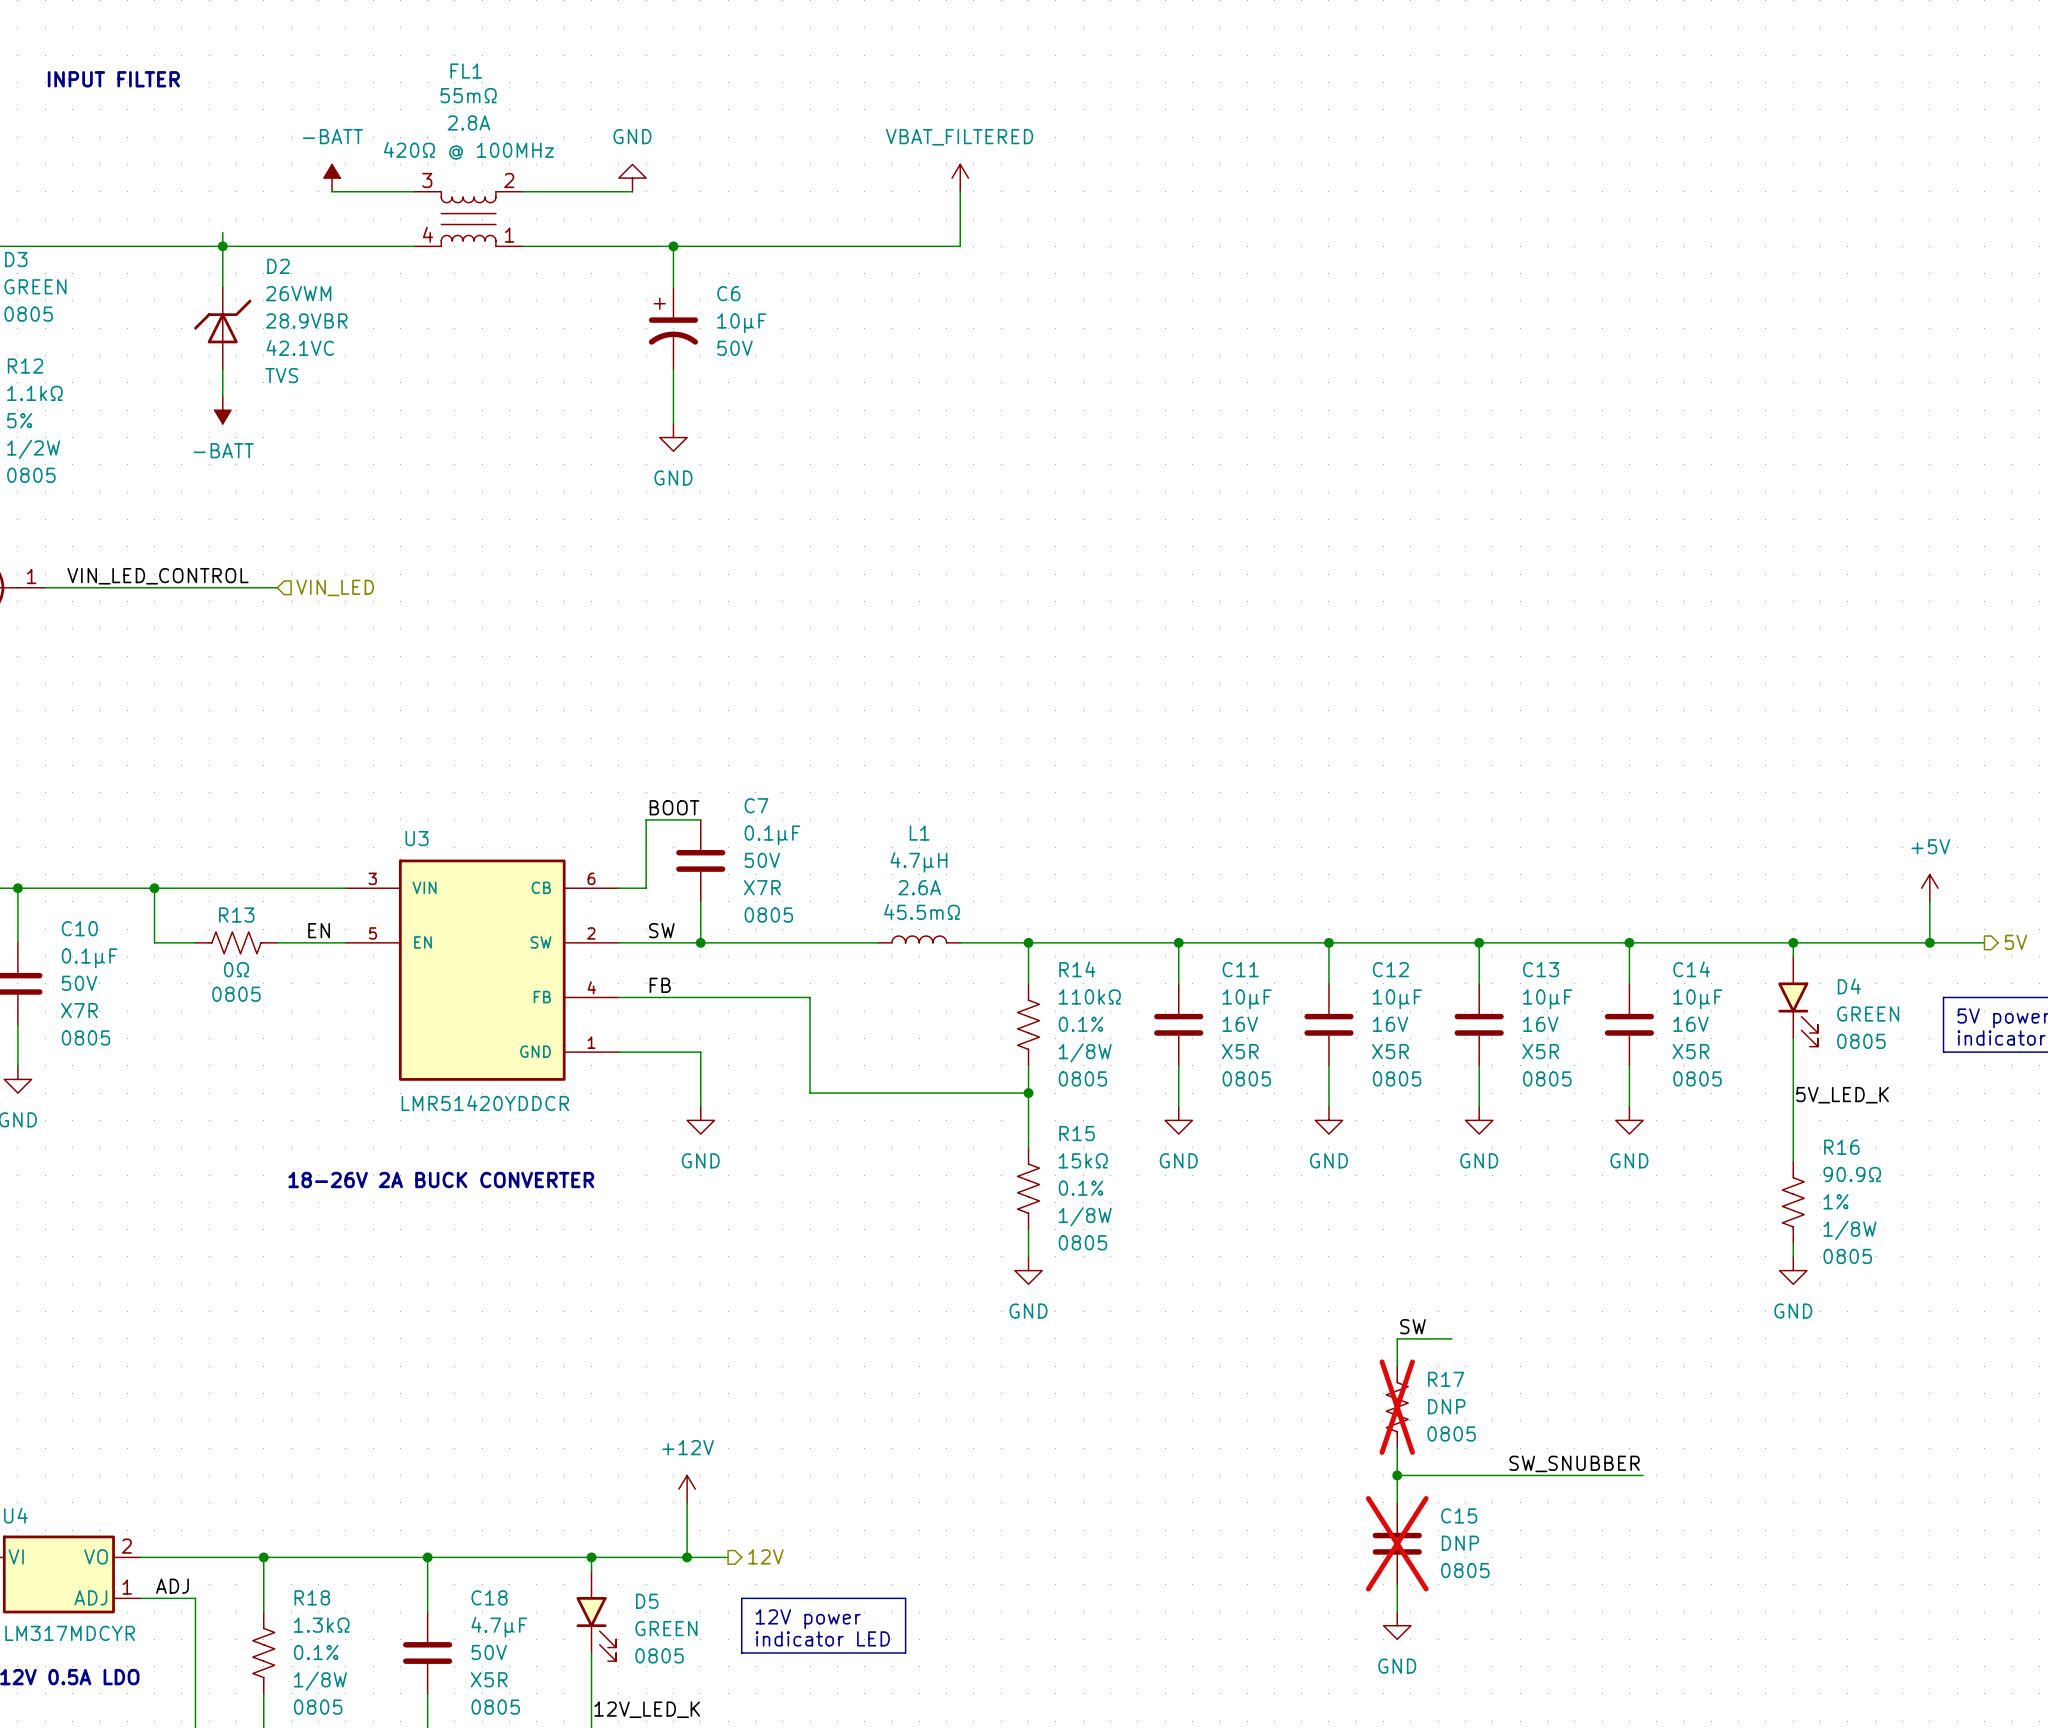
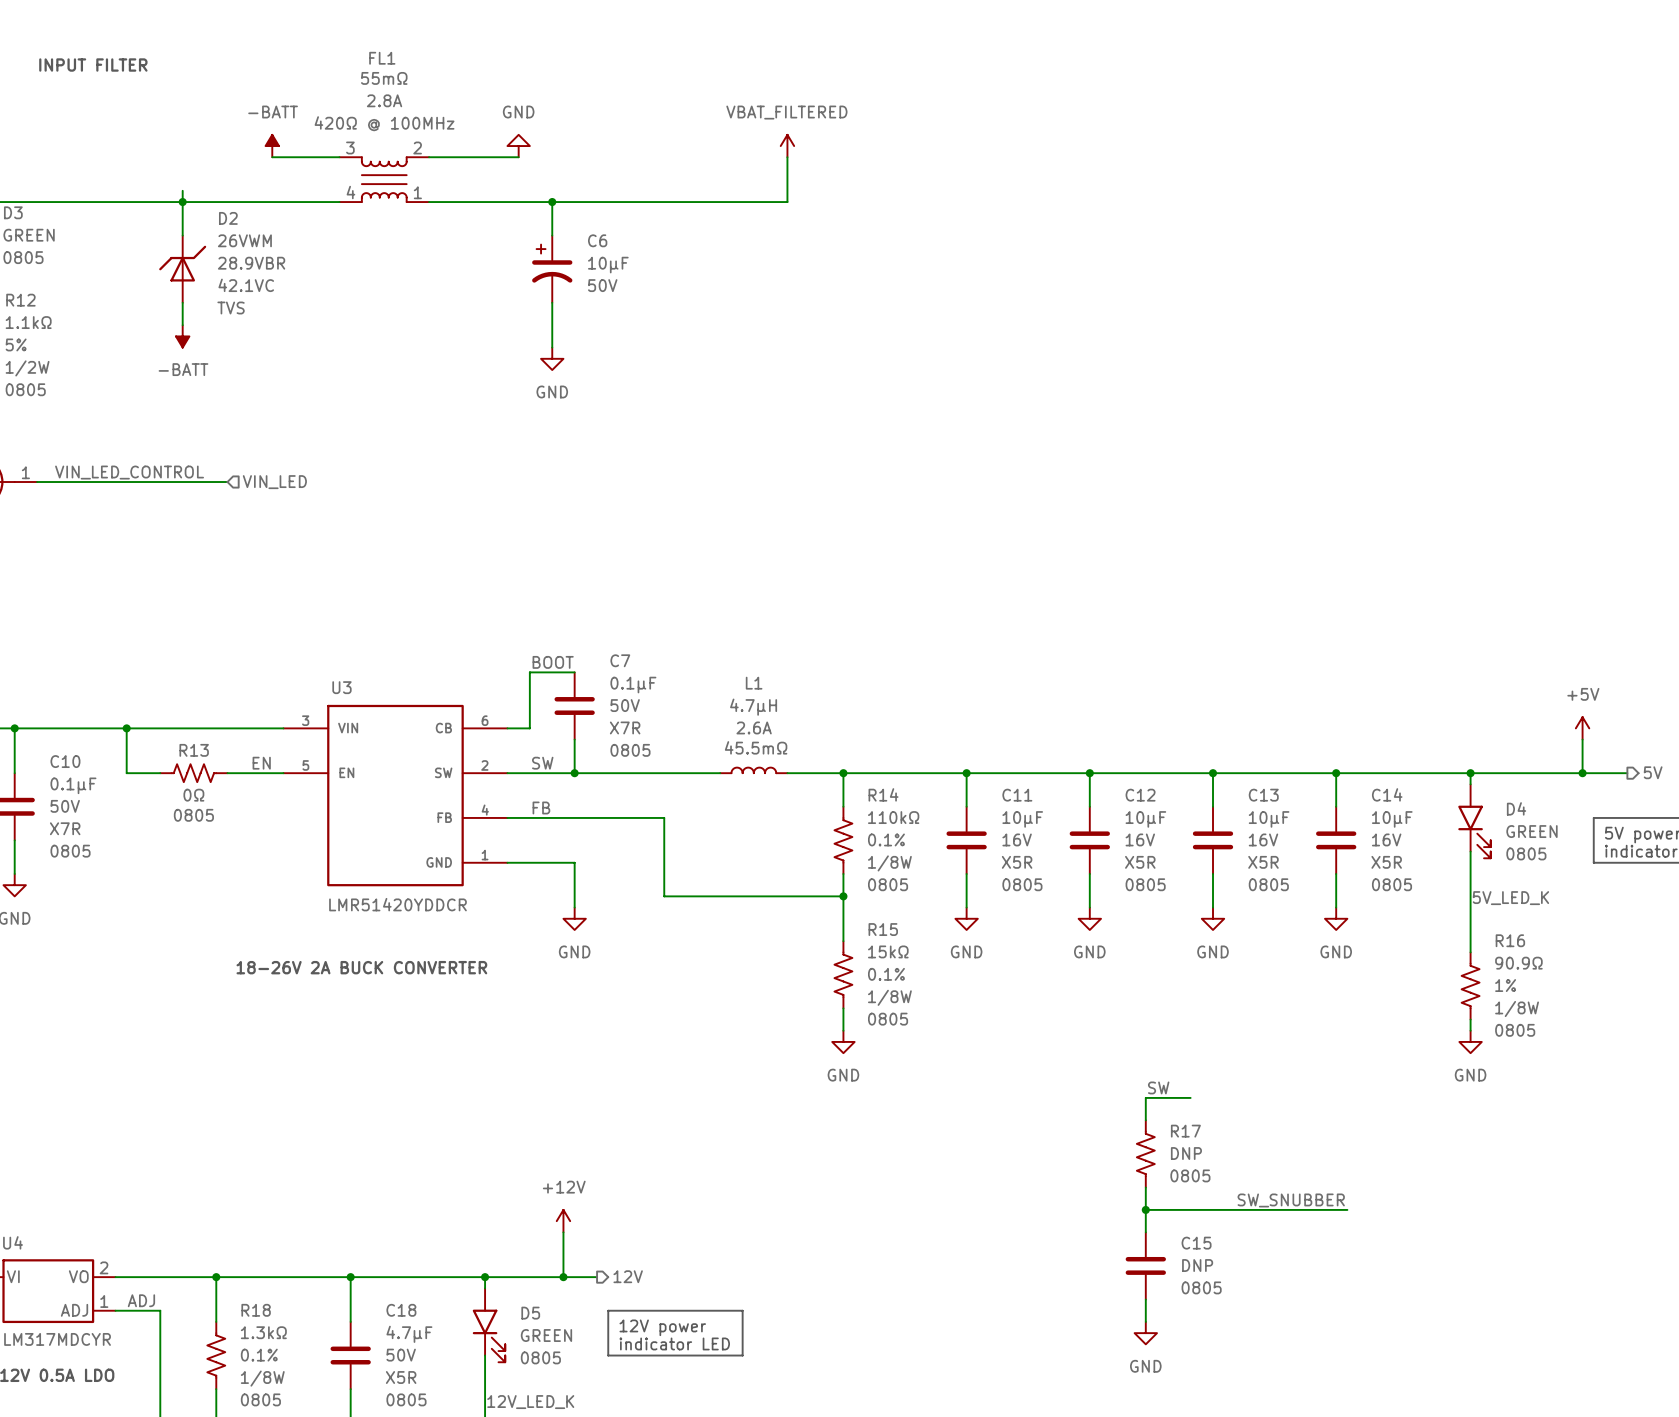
R17 do-not-place cross: (1397, 1407) -> none
C15 do-not-place cross: (1397, 1543) -> none

